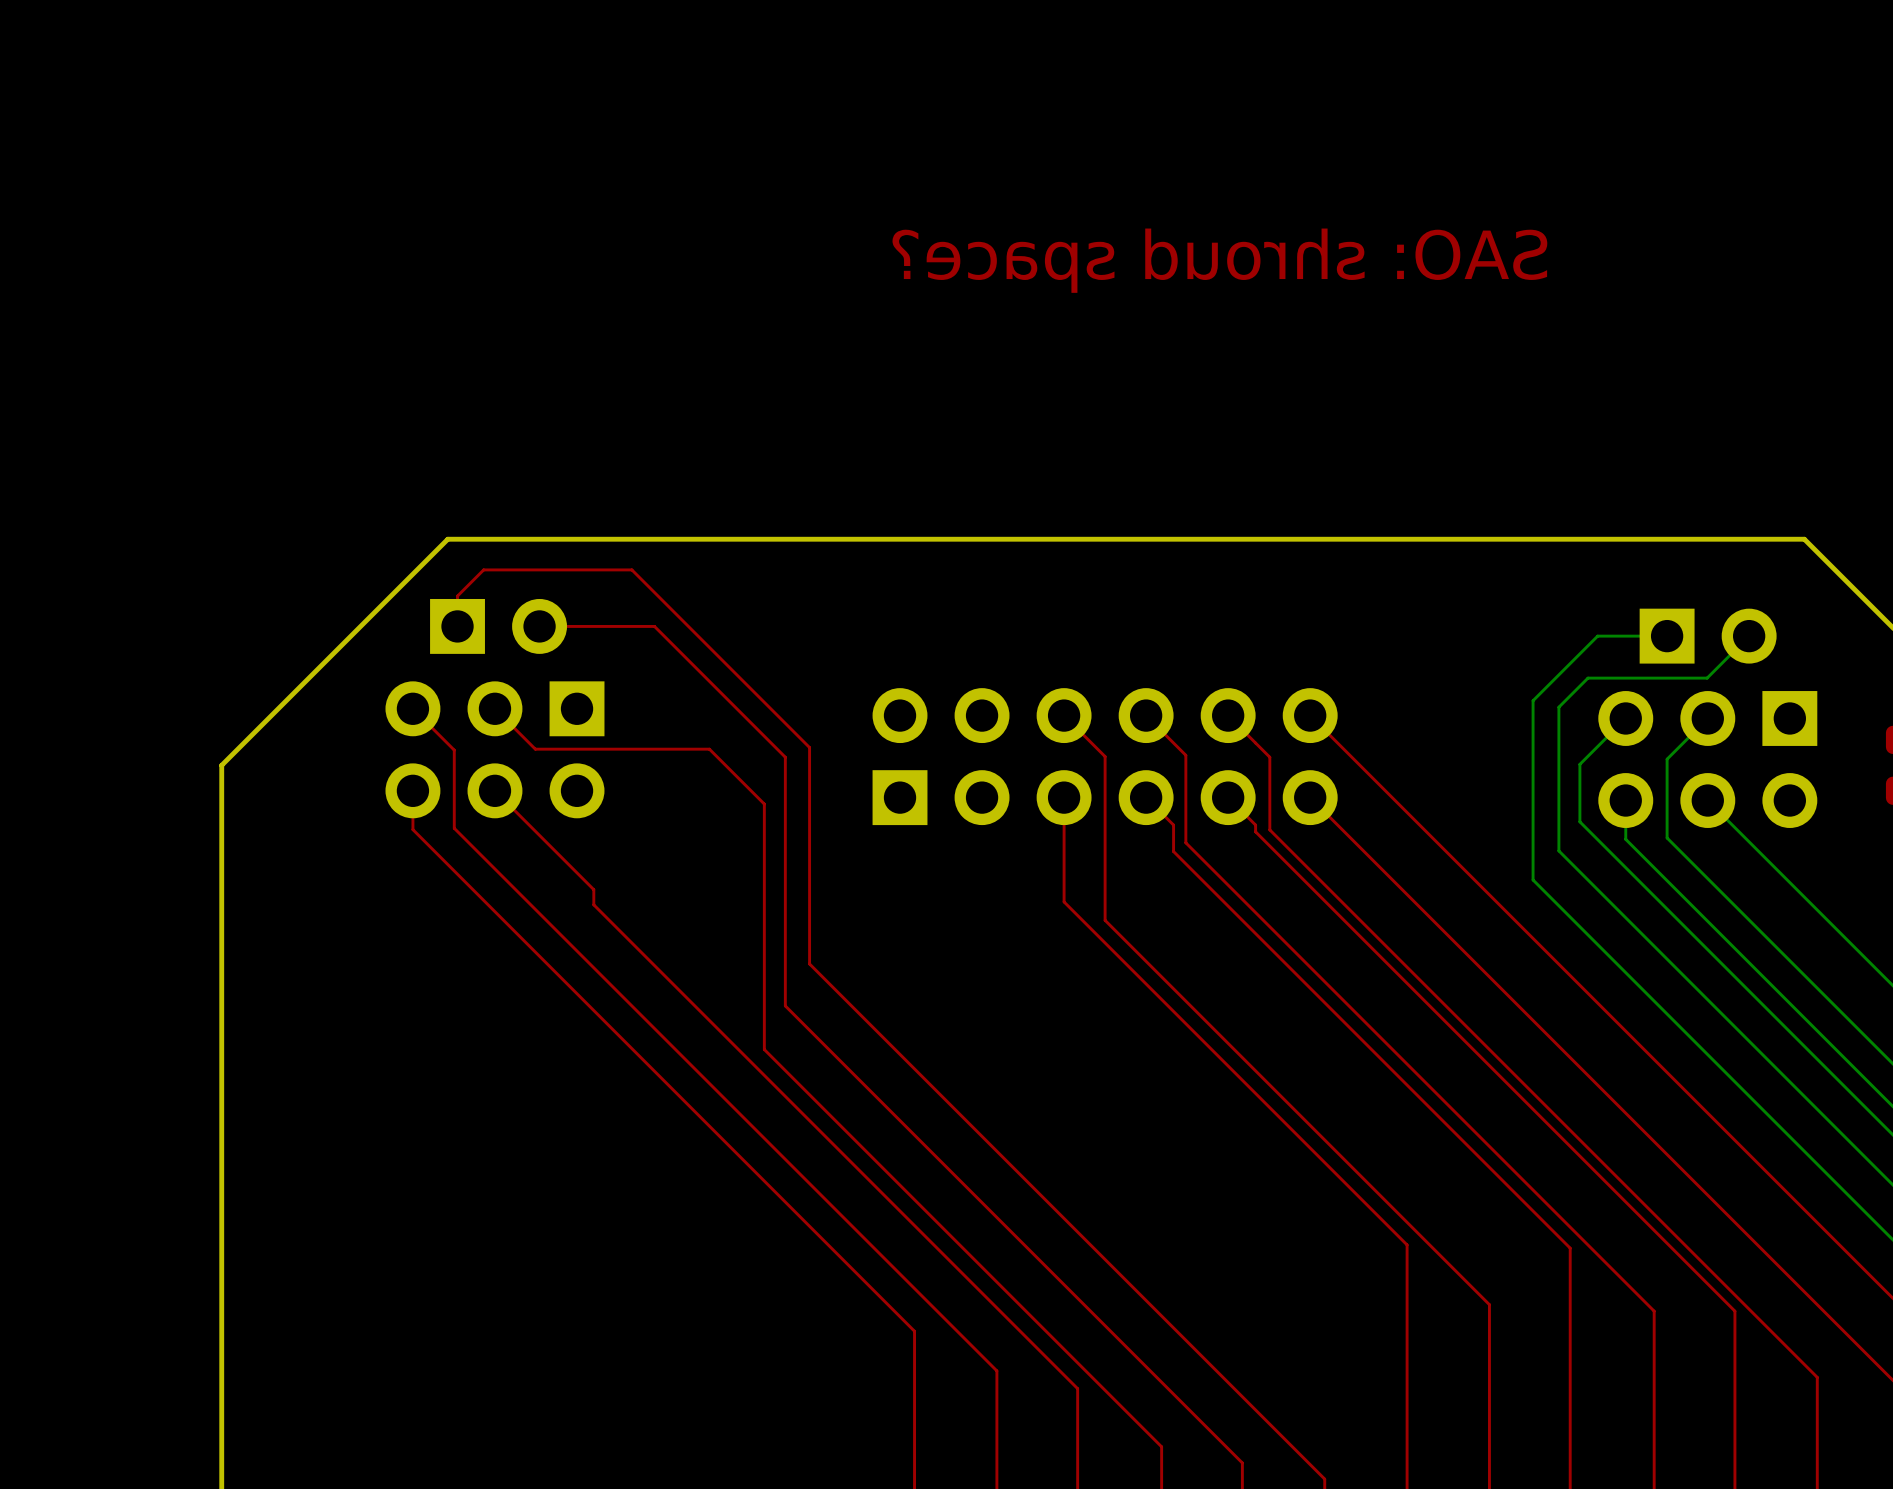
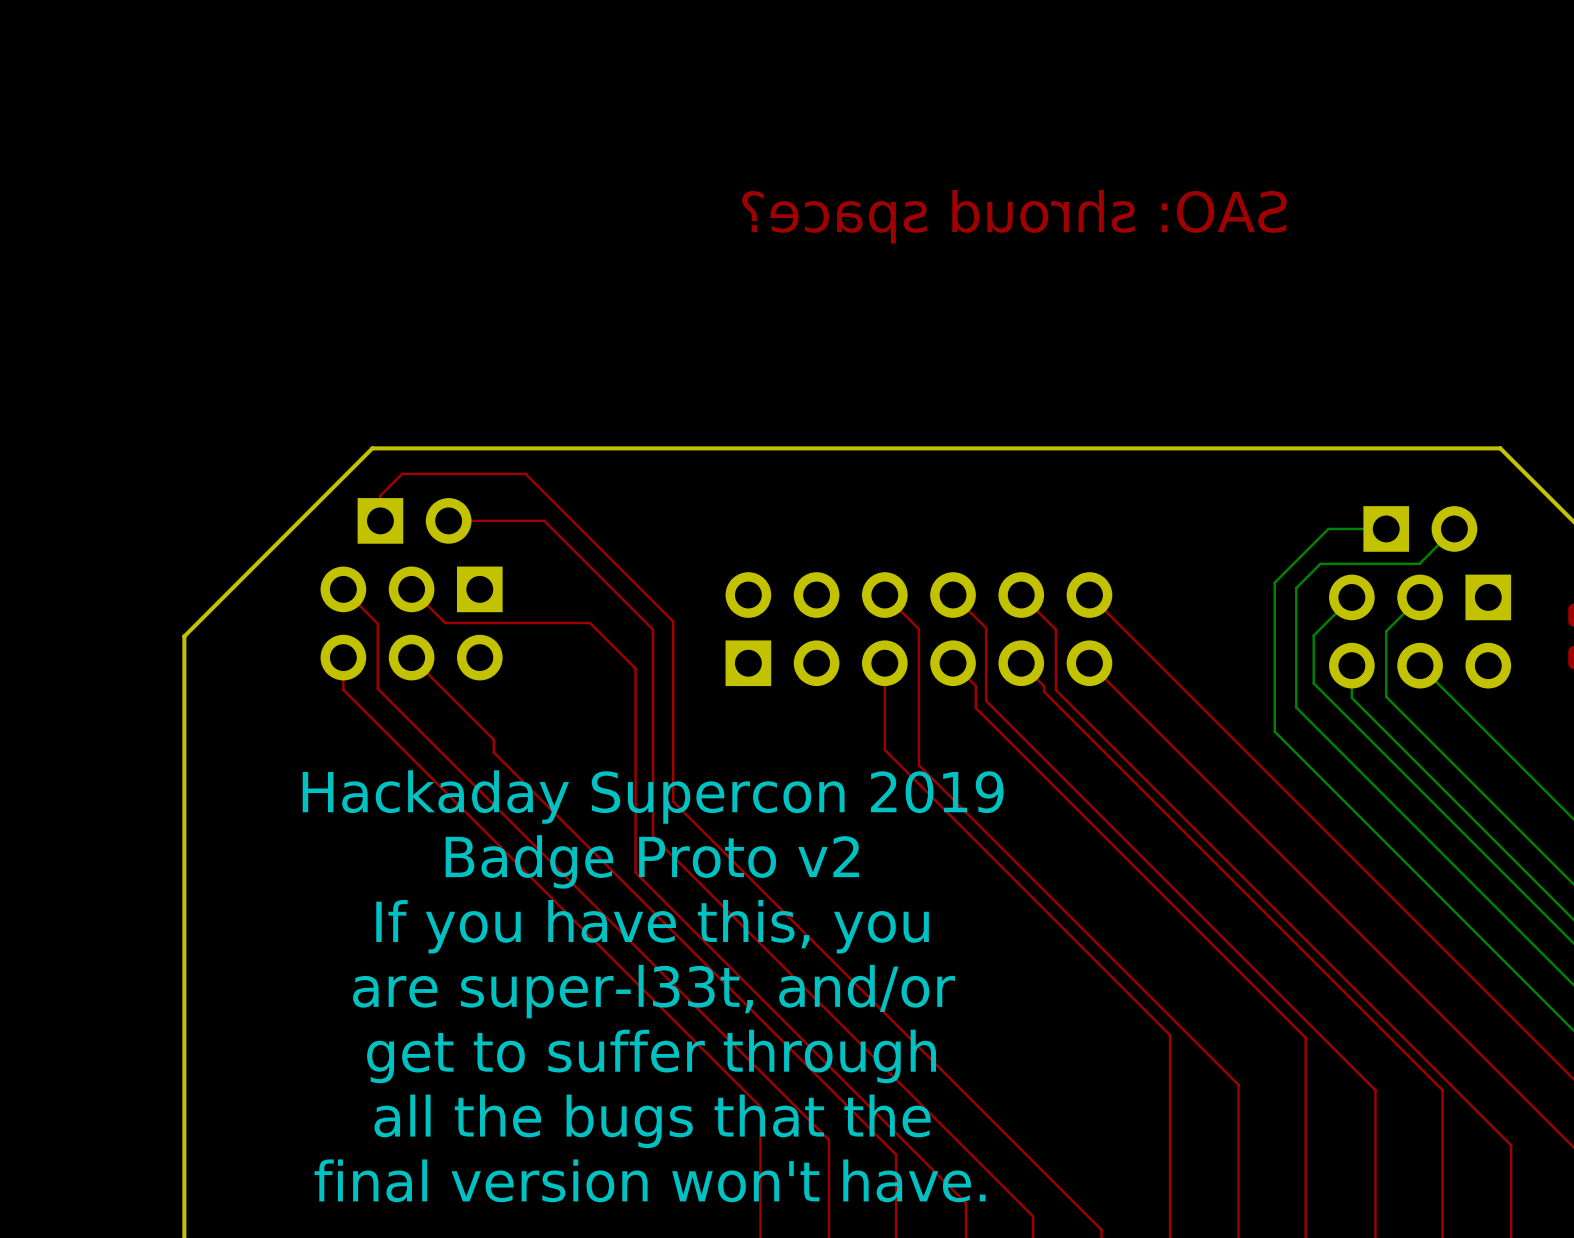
text: none -> Hackaday Supercon 2019 (653, 797)
text: none -> Badge Proto v2 (652, 861)
text: none -> If you have this, you (652, 926)
text: none -> are super-l33t, and/or (654, 991)
text: none -> get to suffer through (651, 1056)
text: none -> all the bugs that the (652, 1121)
text: none -> final version won't have. (650, 1180)

